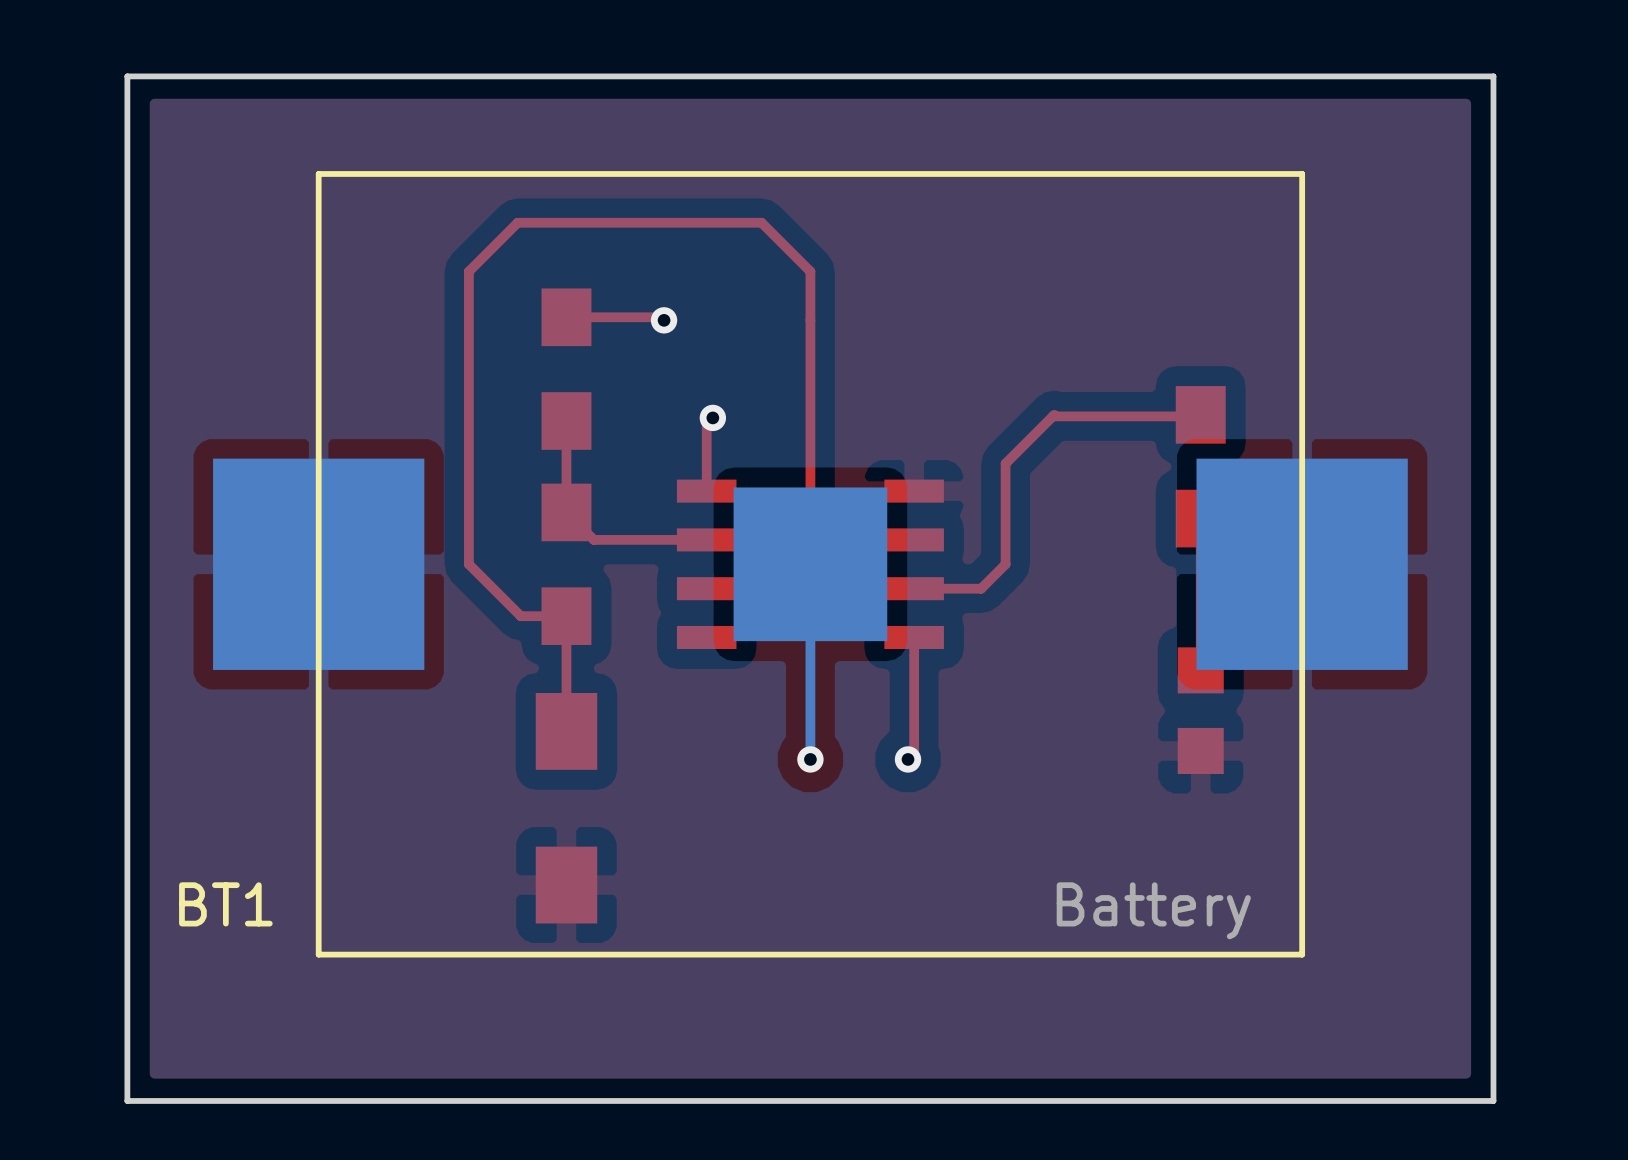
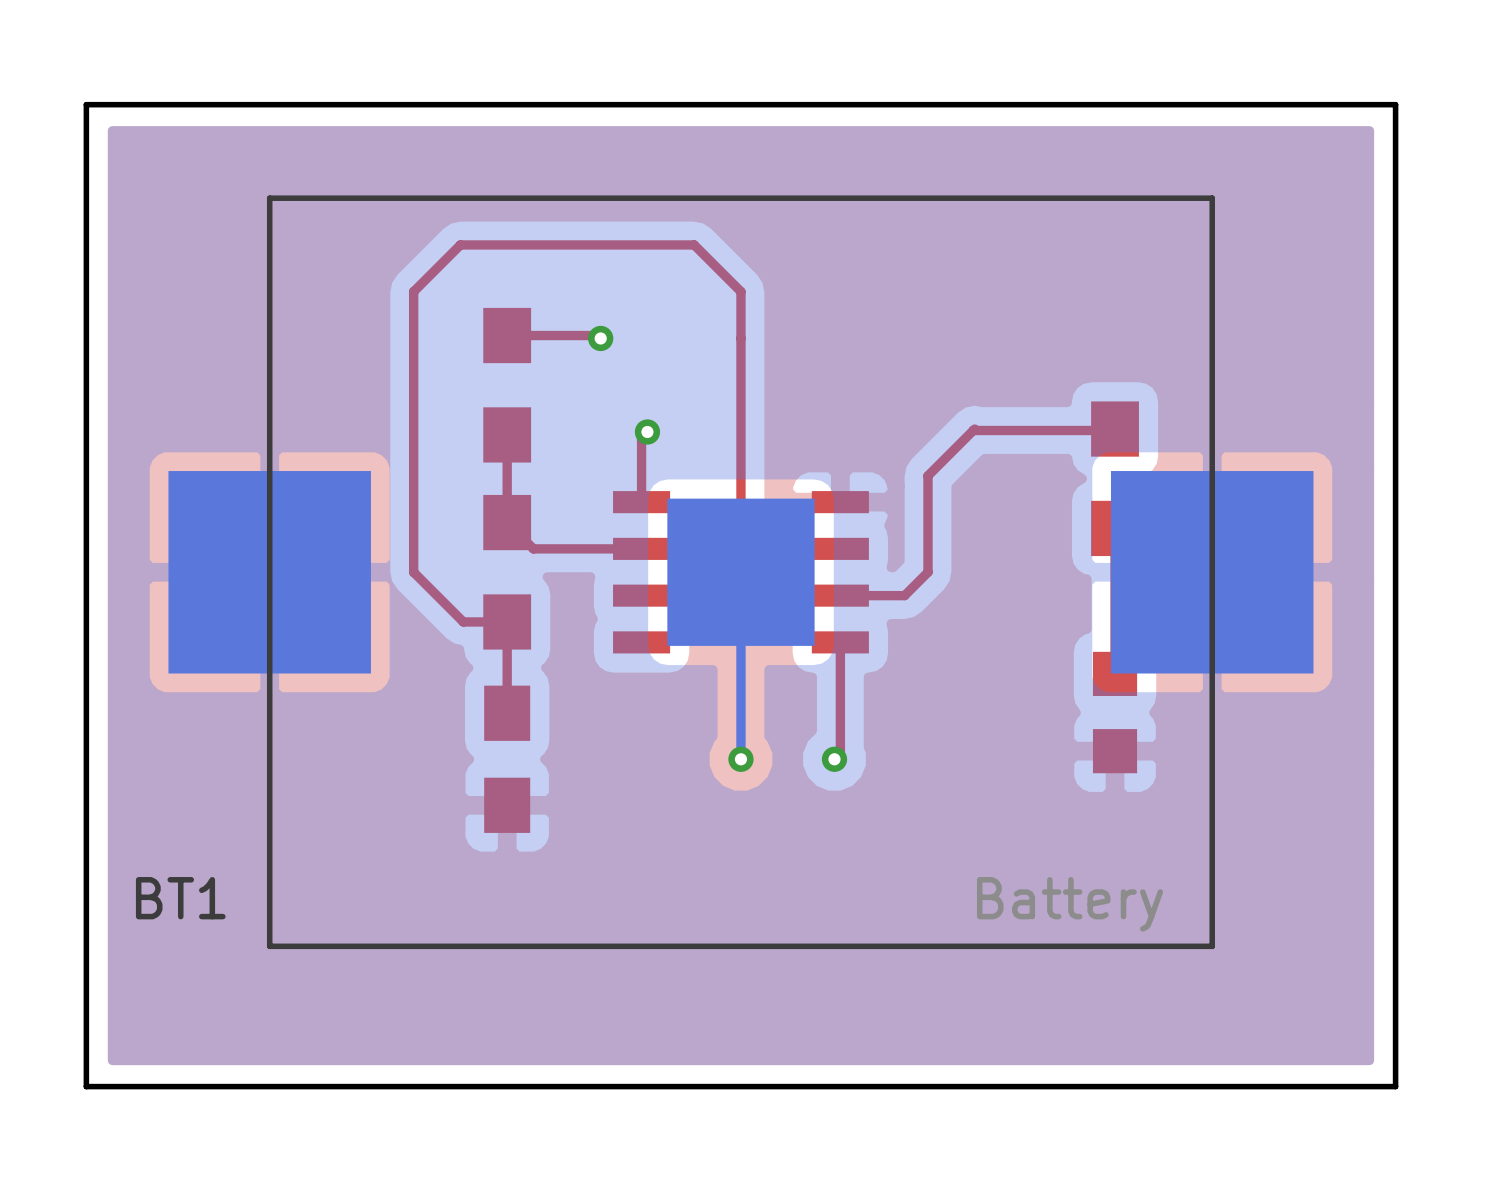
part: none -> (507, 759)
part: (566, 808) -> none

